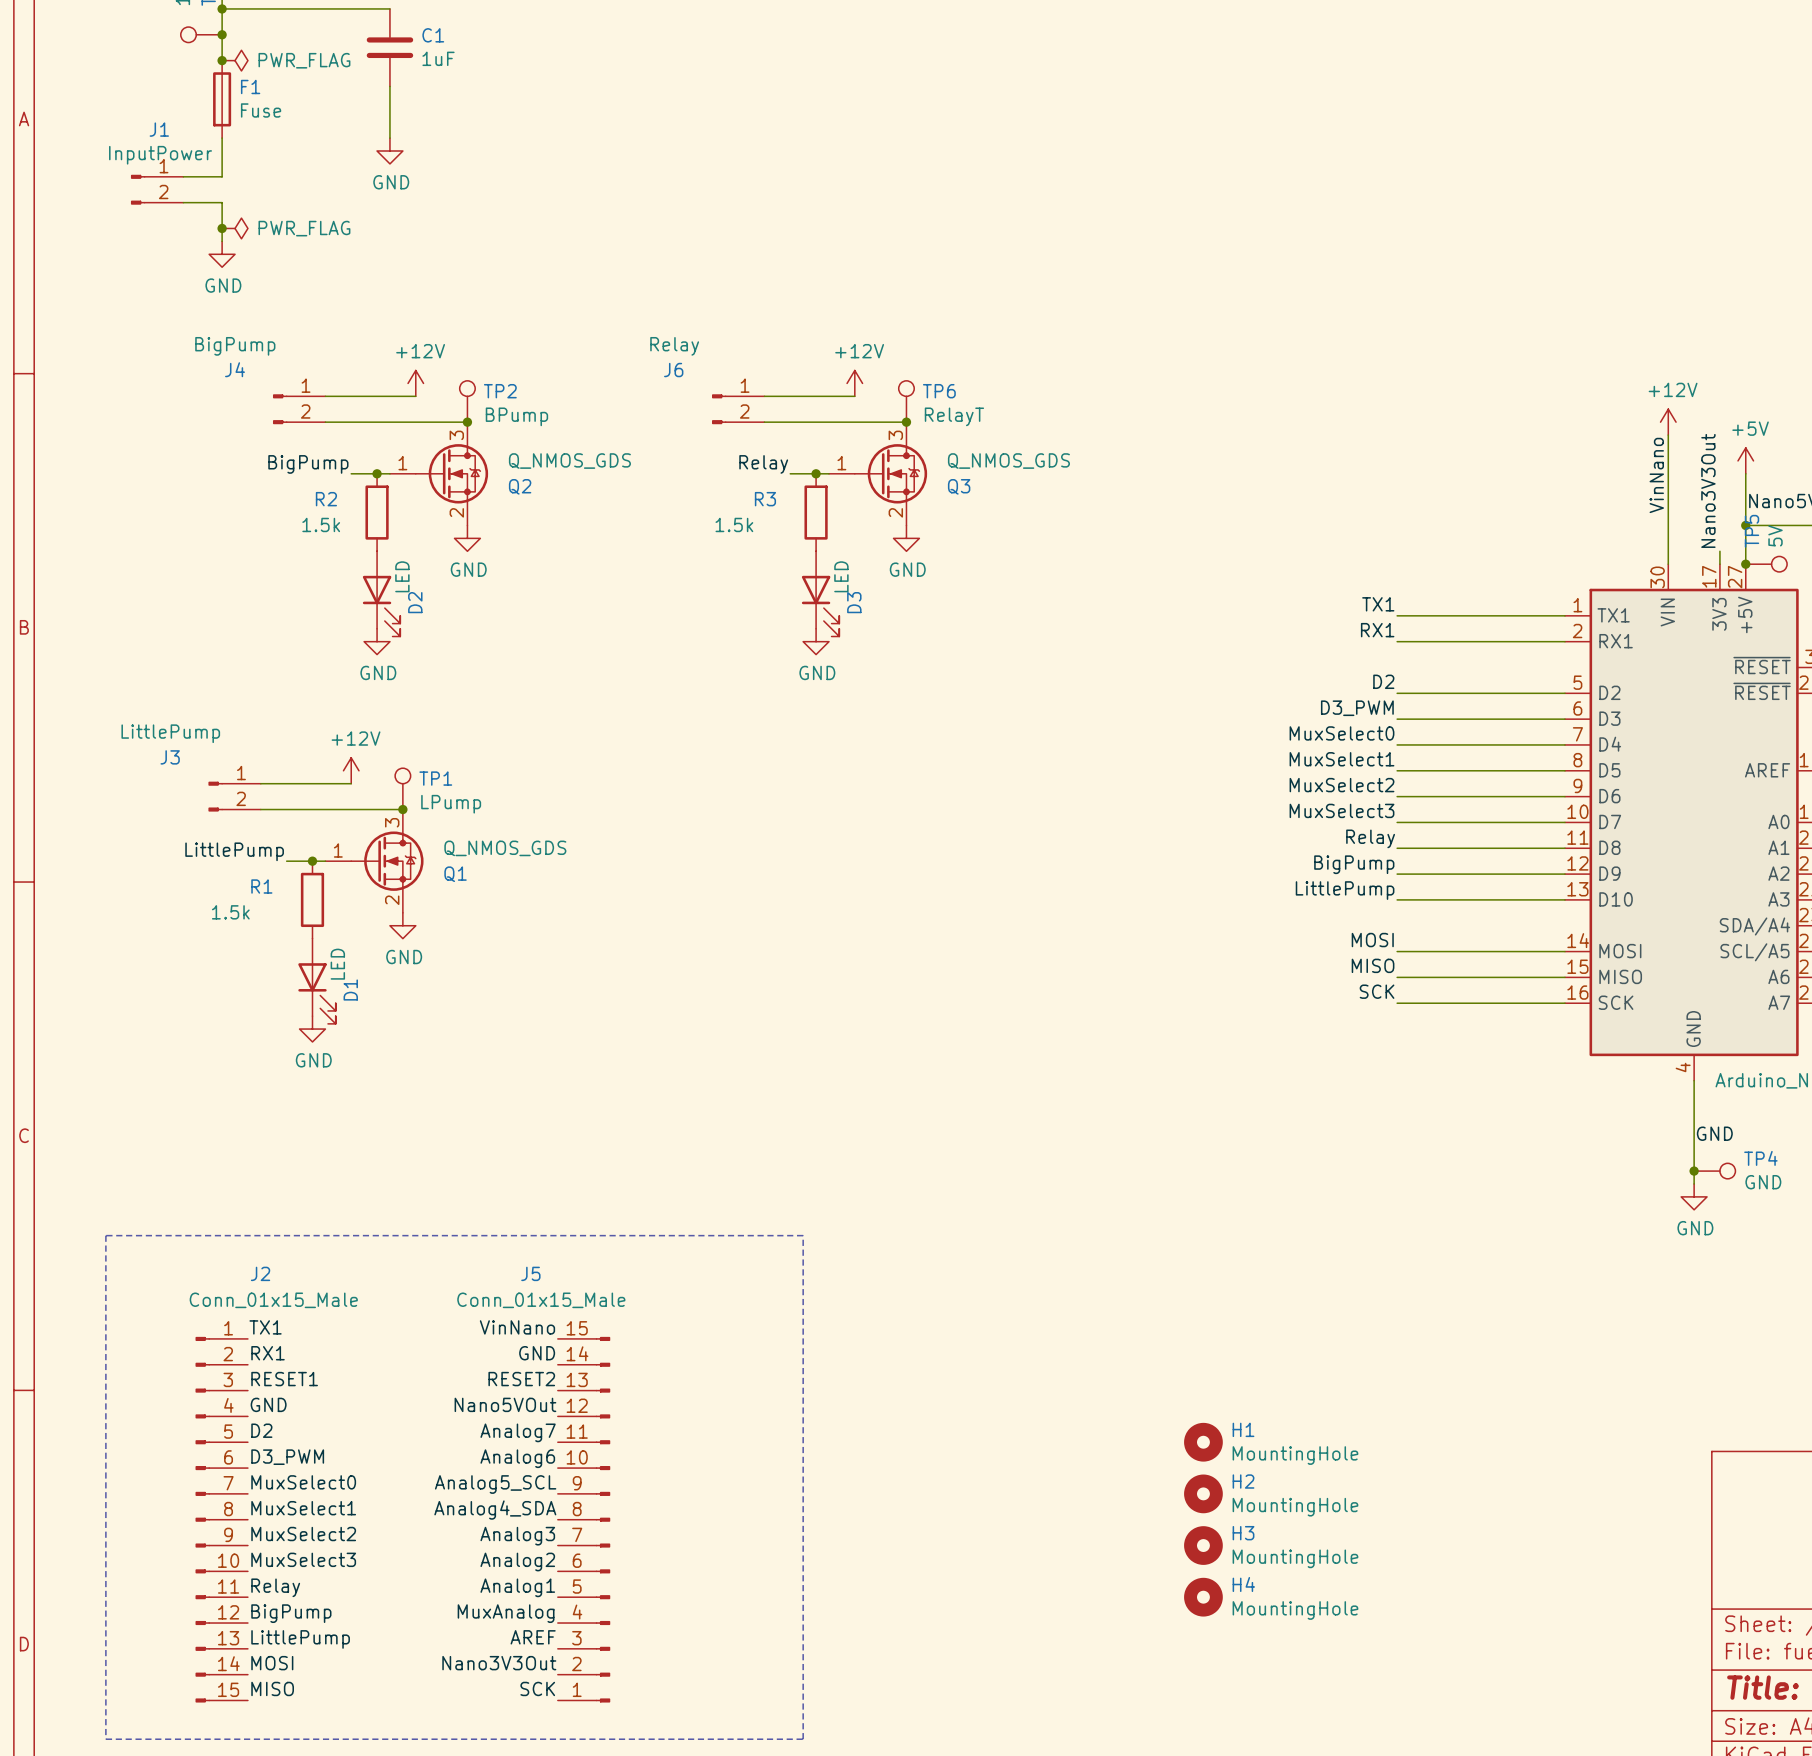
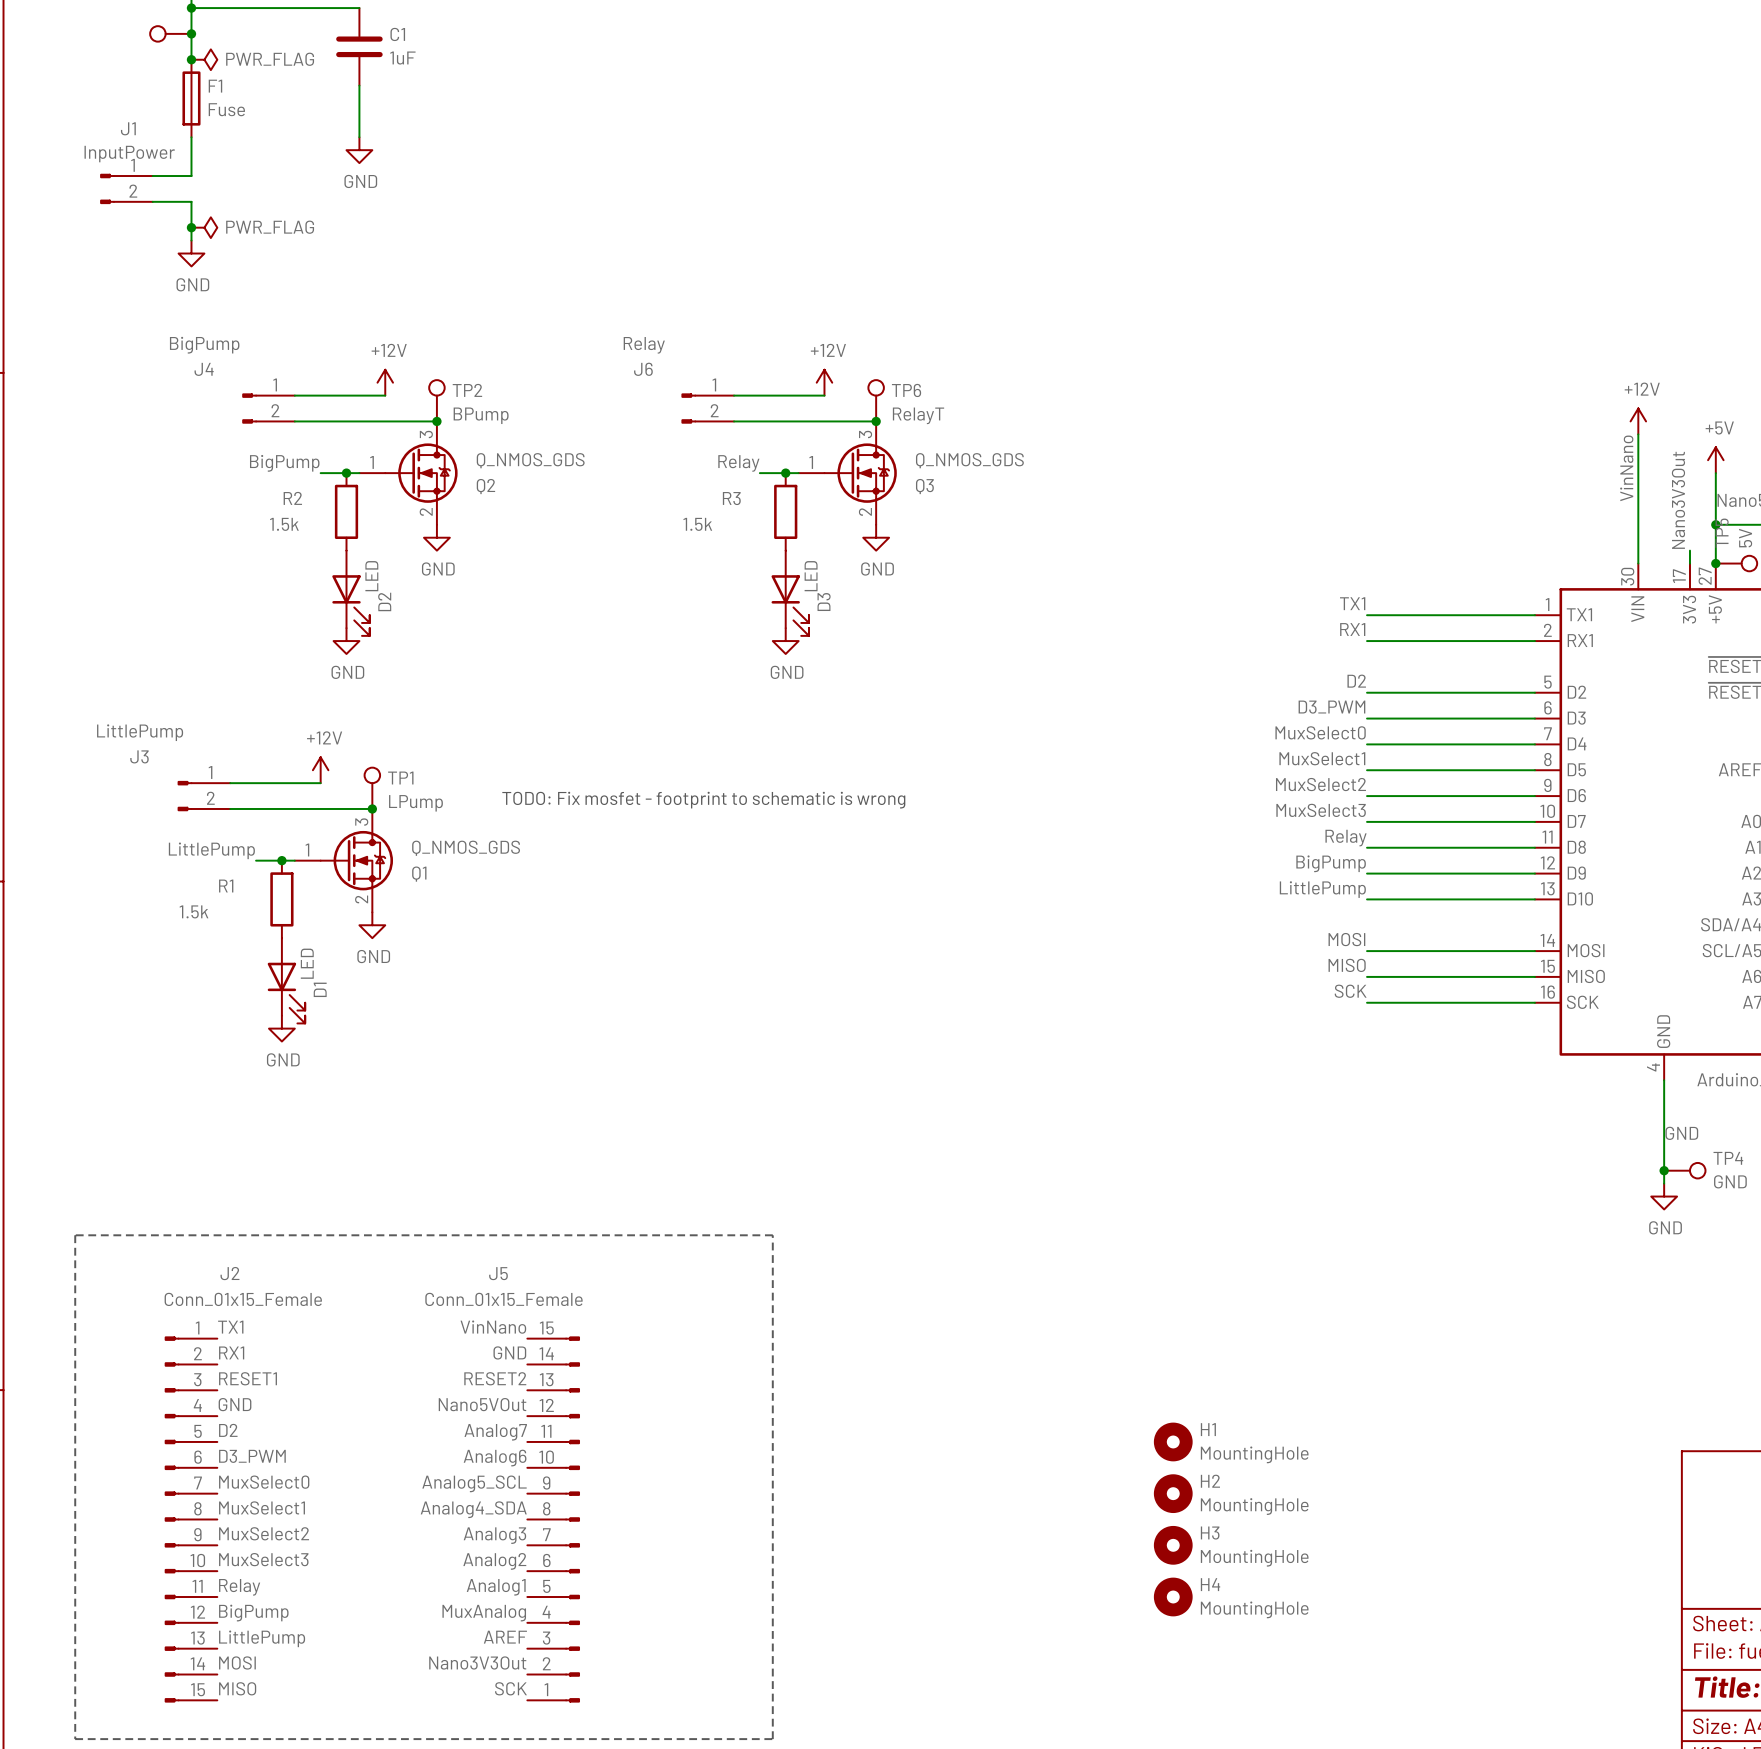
text: none -> TODO: Fix mosfet - footprint to schematic is wrong (703, 800)
J2 value: Conn_01x15_Male (273, 1300) -> Conn_01x15_Female (243, 1299)
J5 value: Conn_01x15_Male (541, 1300) -> Conn_01x15_Female (503, 1299)

